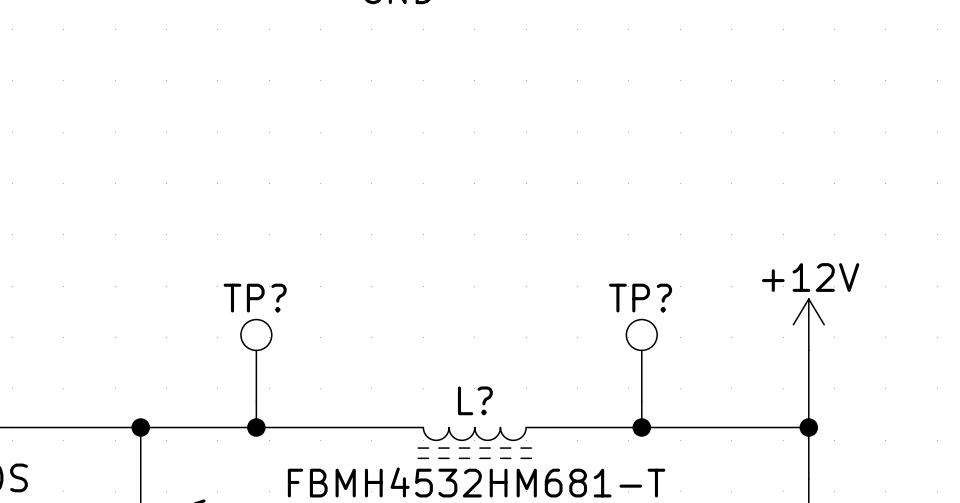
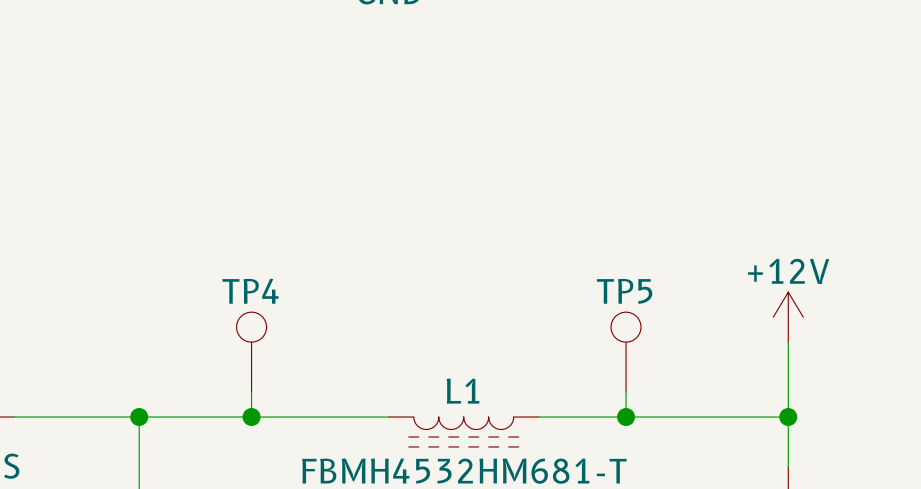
TP? name: TP? (255, 298) -> TP4 (250, 291)
TP? name: TP? (640, 298) -> TP5 (624, 291)
L? name: L? (475, 400) -> L1 (463, 391)

